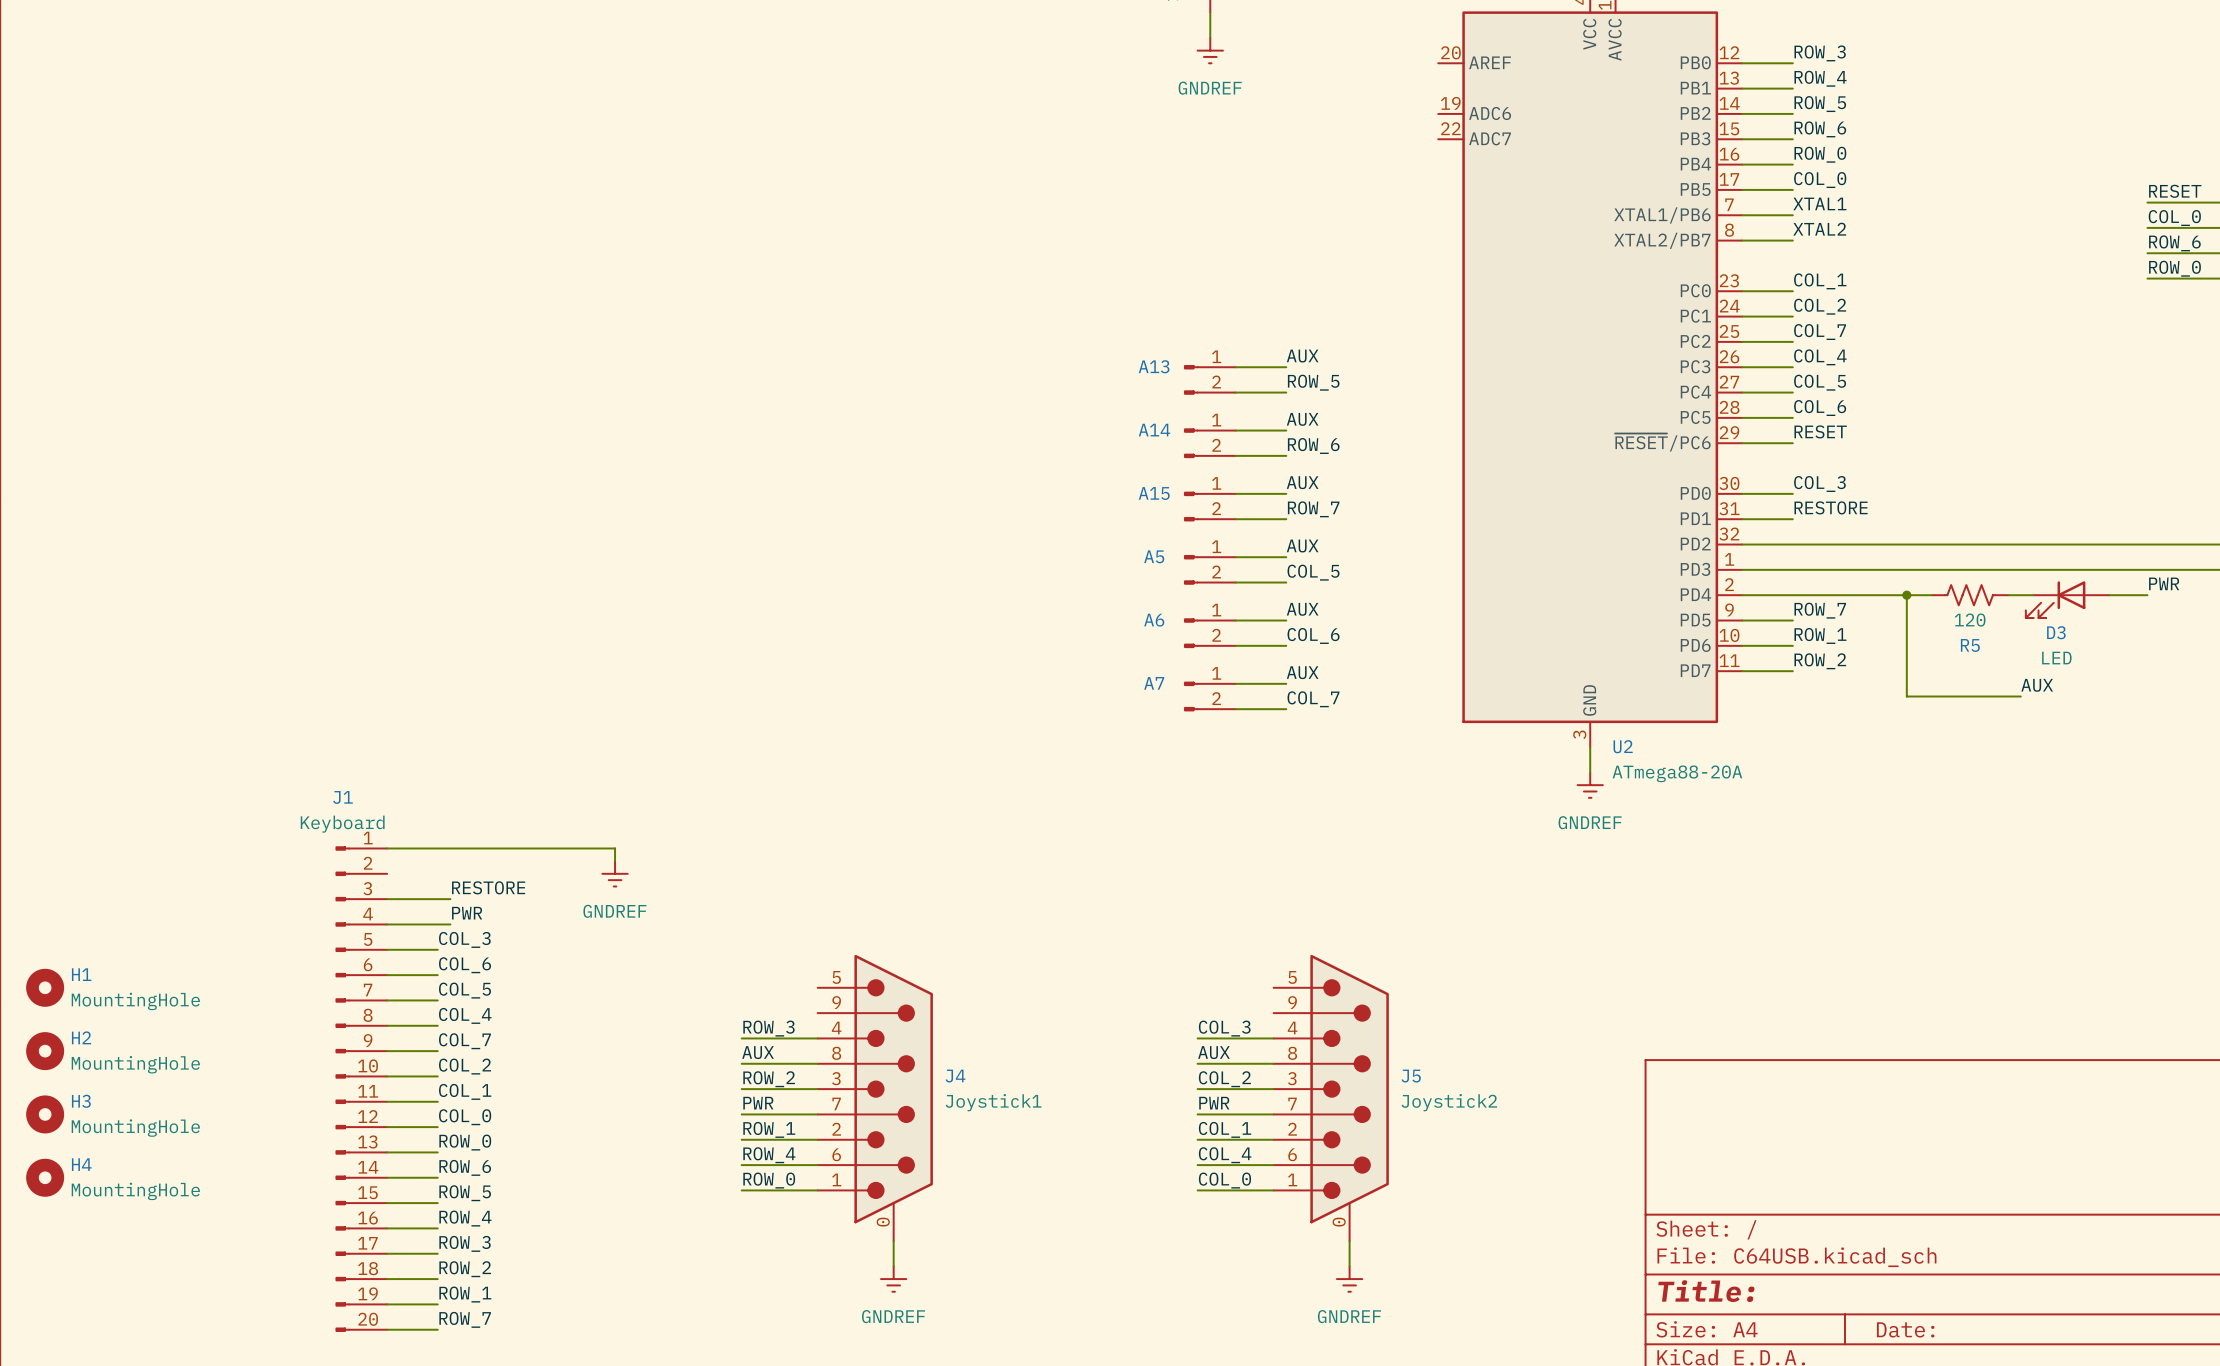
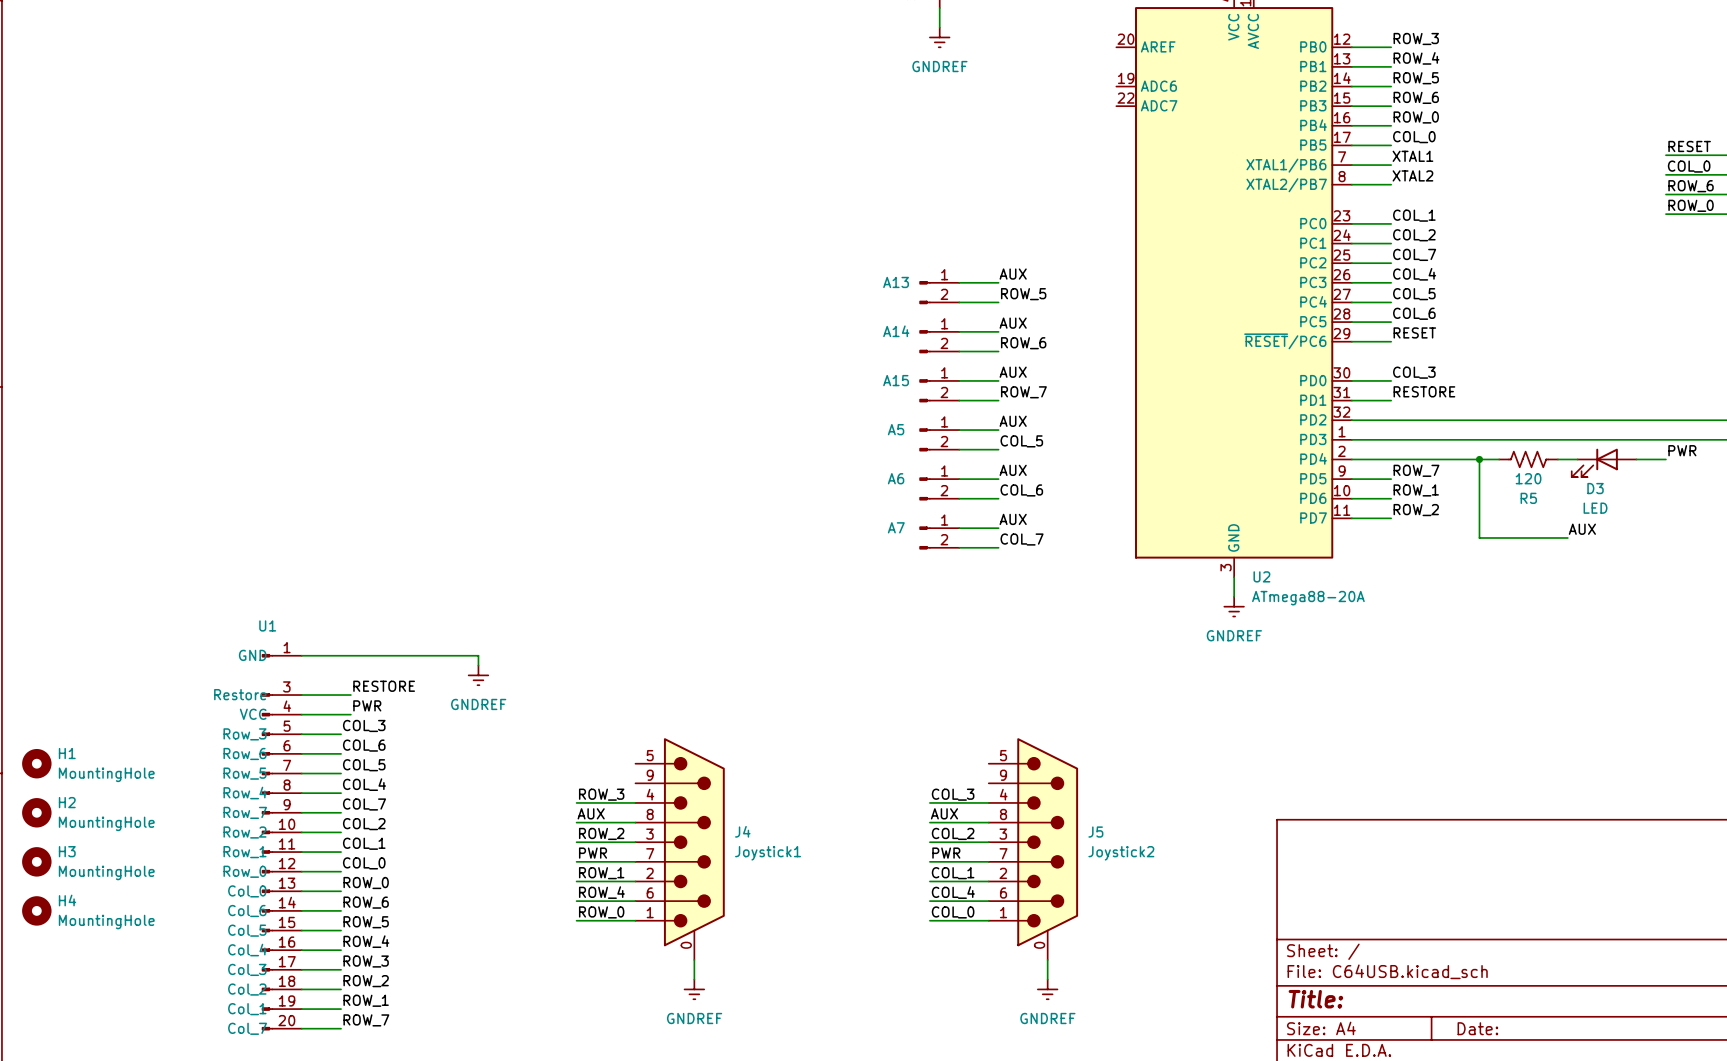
J1: Keyboard (361, 1089) -> none
U1: none -> (281, 842)

